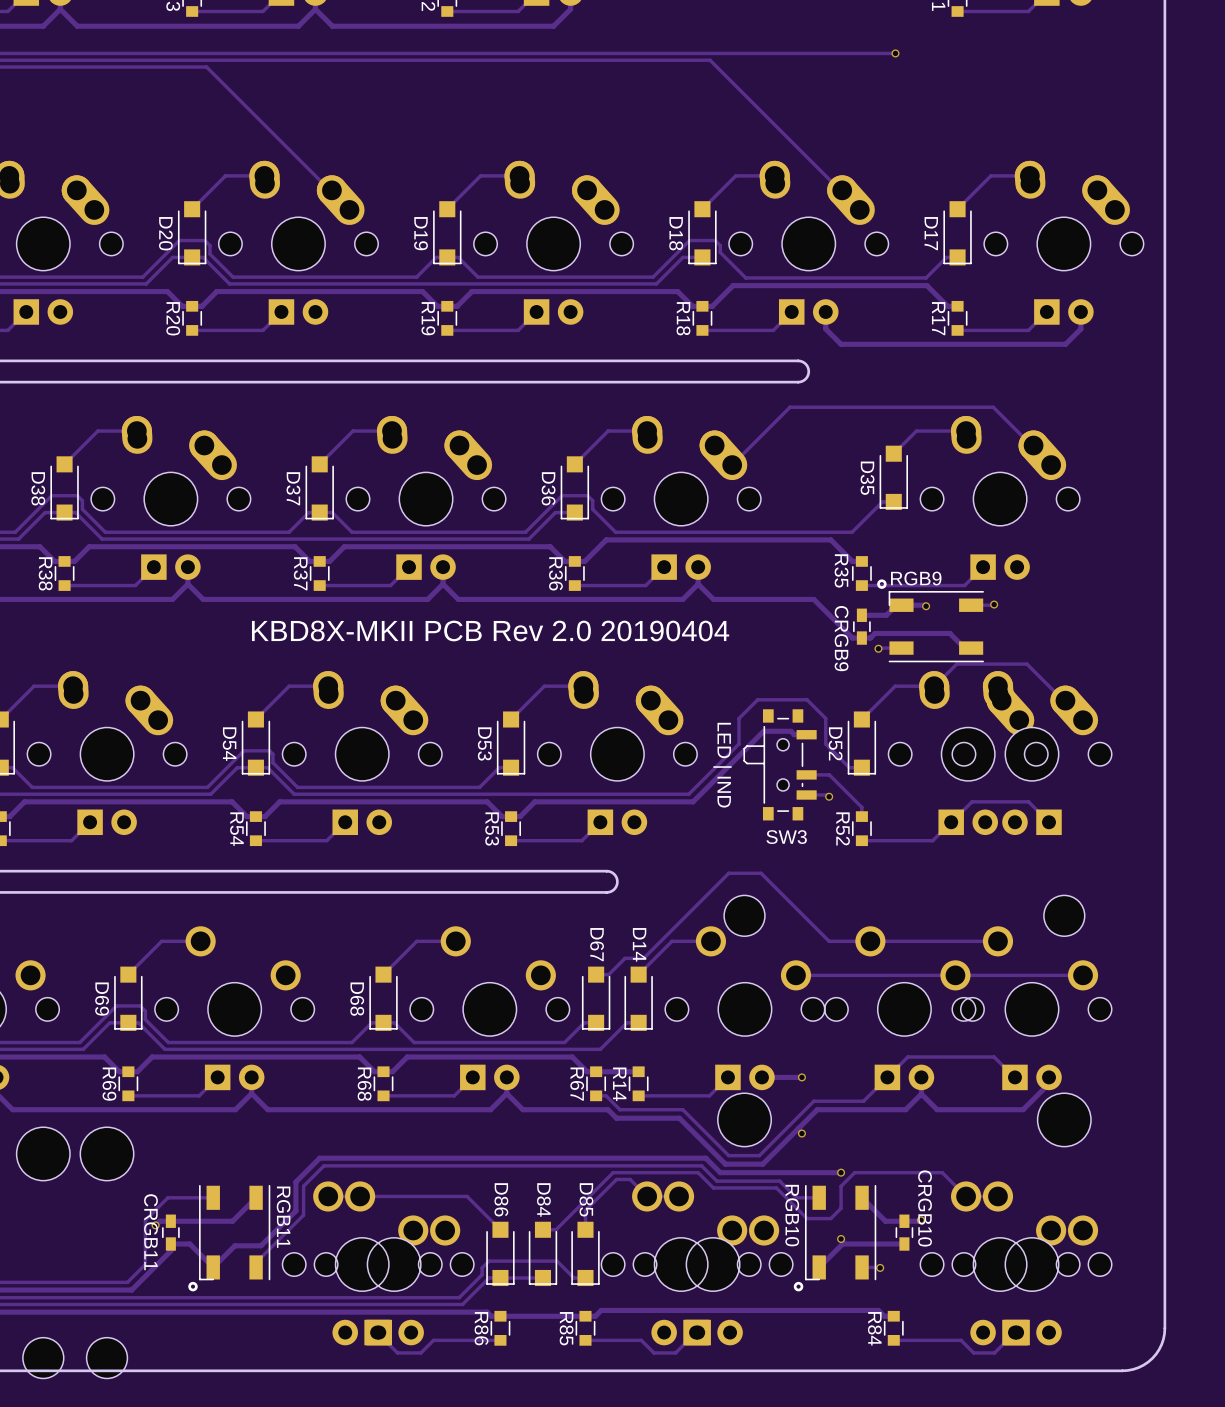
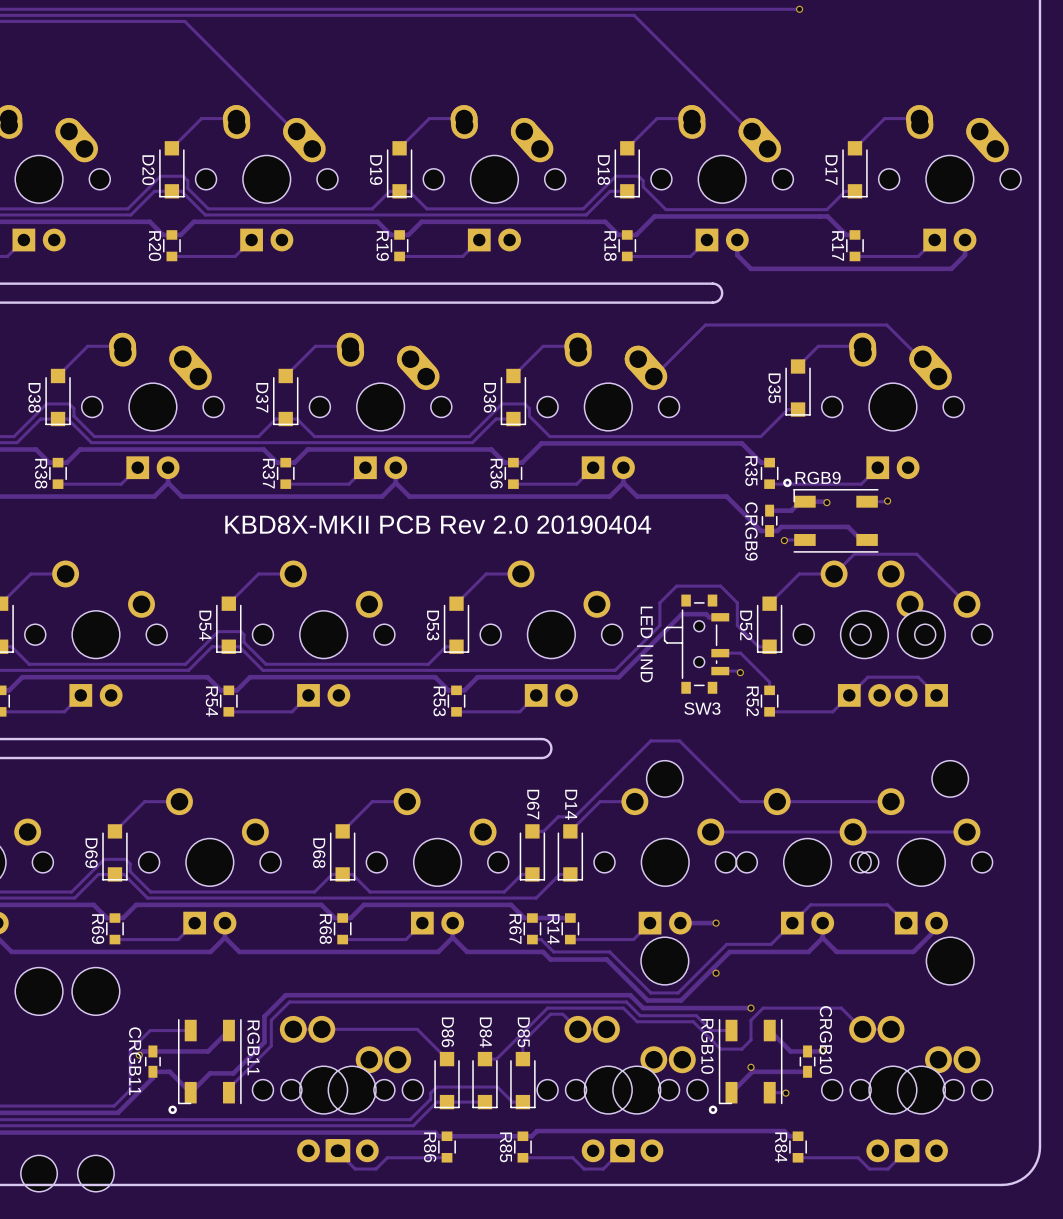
part footprint: [27, 671, 187, 836] -> [24, 560, 168, 707]
part footprint: [282, 671, 443, 836] -> [252, 560, 395, 707]
part footprint: [537, 671, 698, 836] -> [480, 560, 623, 707]
part footprint: [888, 671, 1048, 836] -> [793, 560, 936, 707]
part footprint: [952, 671, 1112, 836] -> [850, 560, 993, 707]

